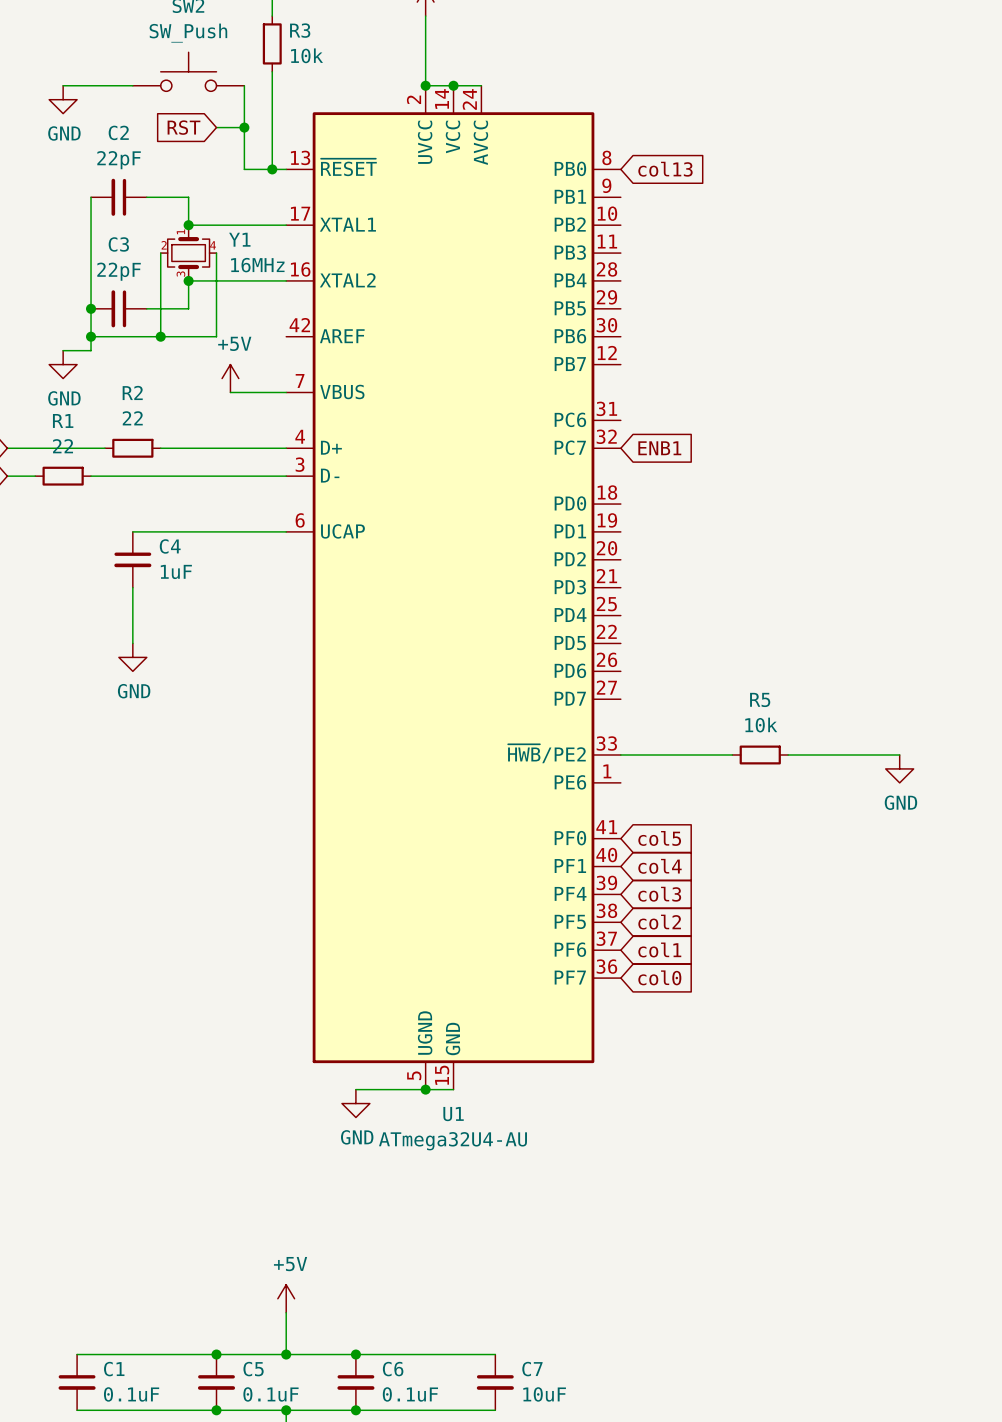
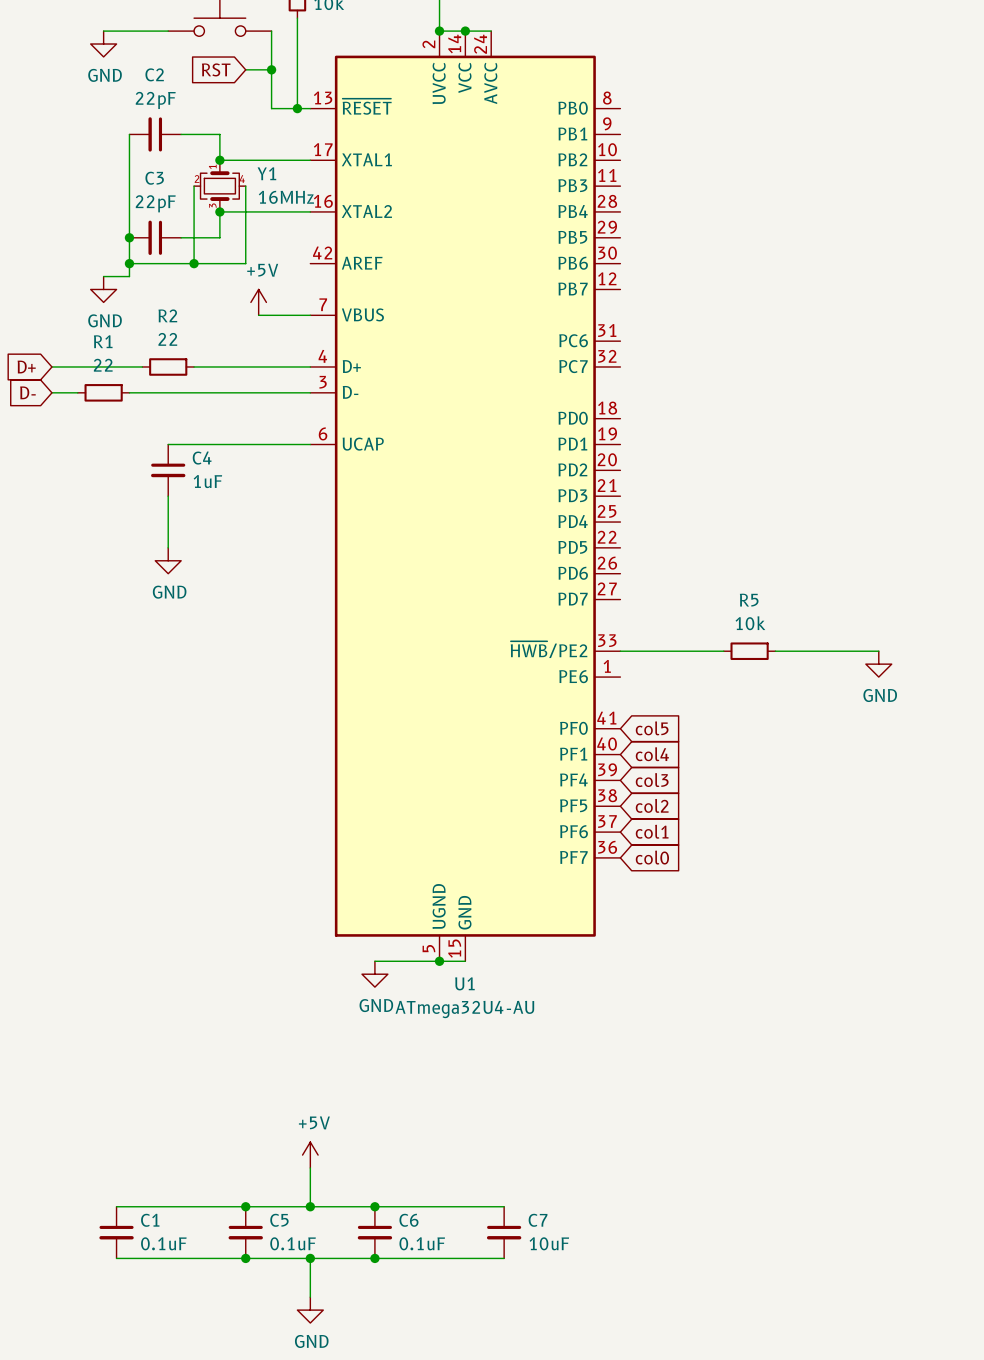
global label: col13 (665, 169) -> none
global label: ENB1 (659, 448) -> none

